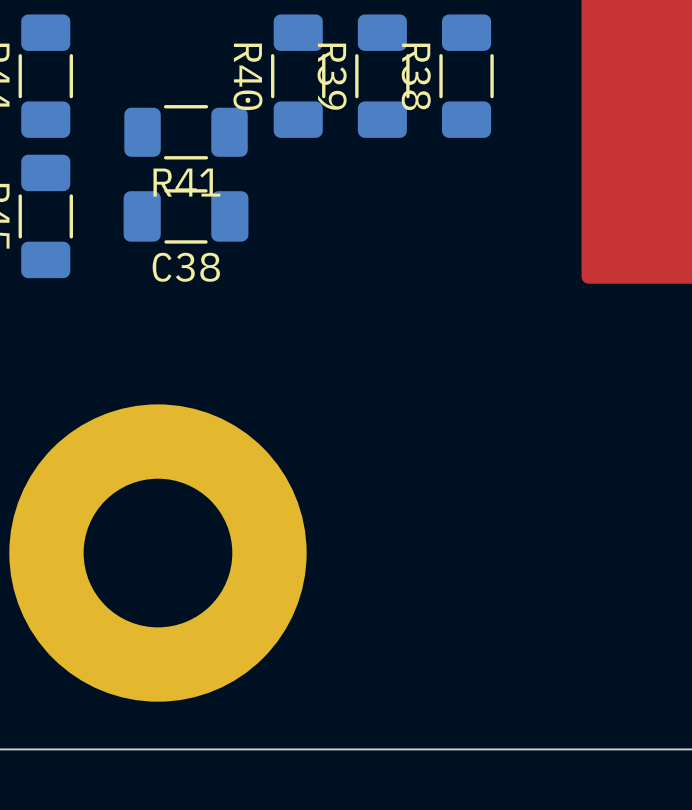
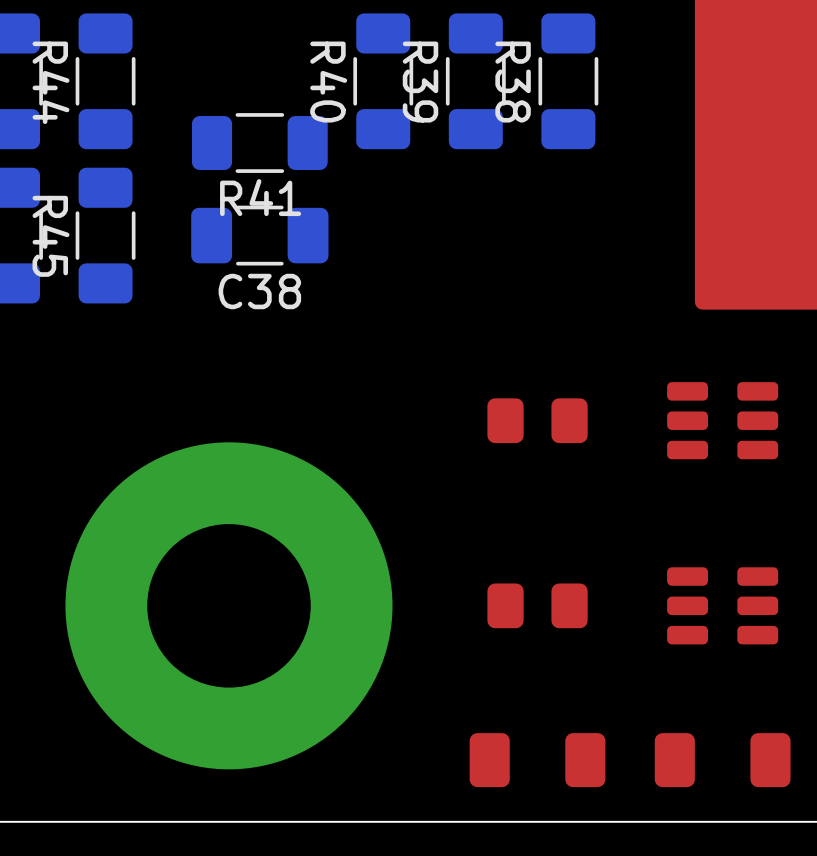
part: none -> (537, 420)
part: none -> (722, 420)
part: none -> (537, 605)
part: none -> (722, 605)
part: none -> (537, 760)
part: none -> (722, 760)

